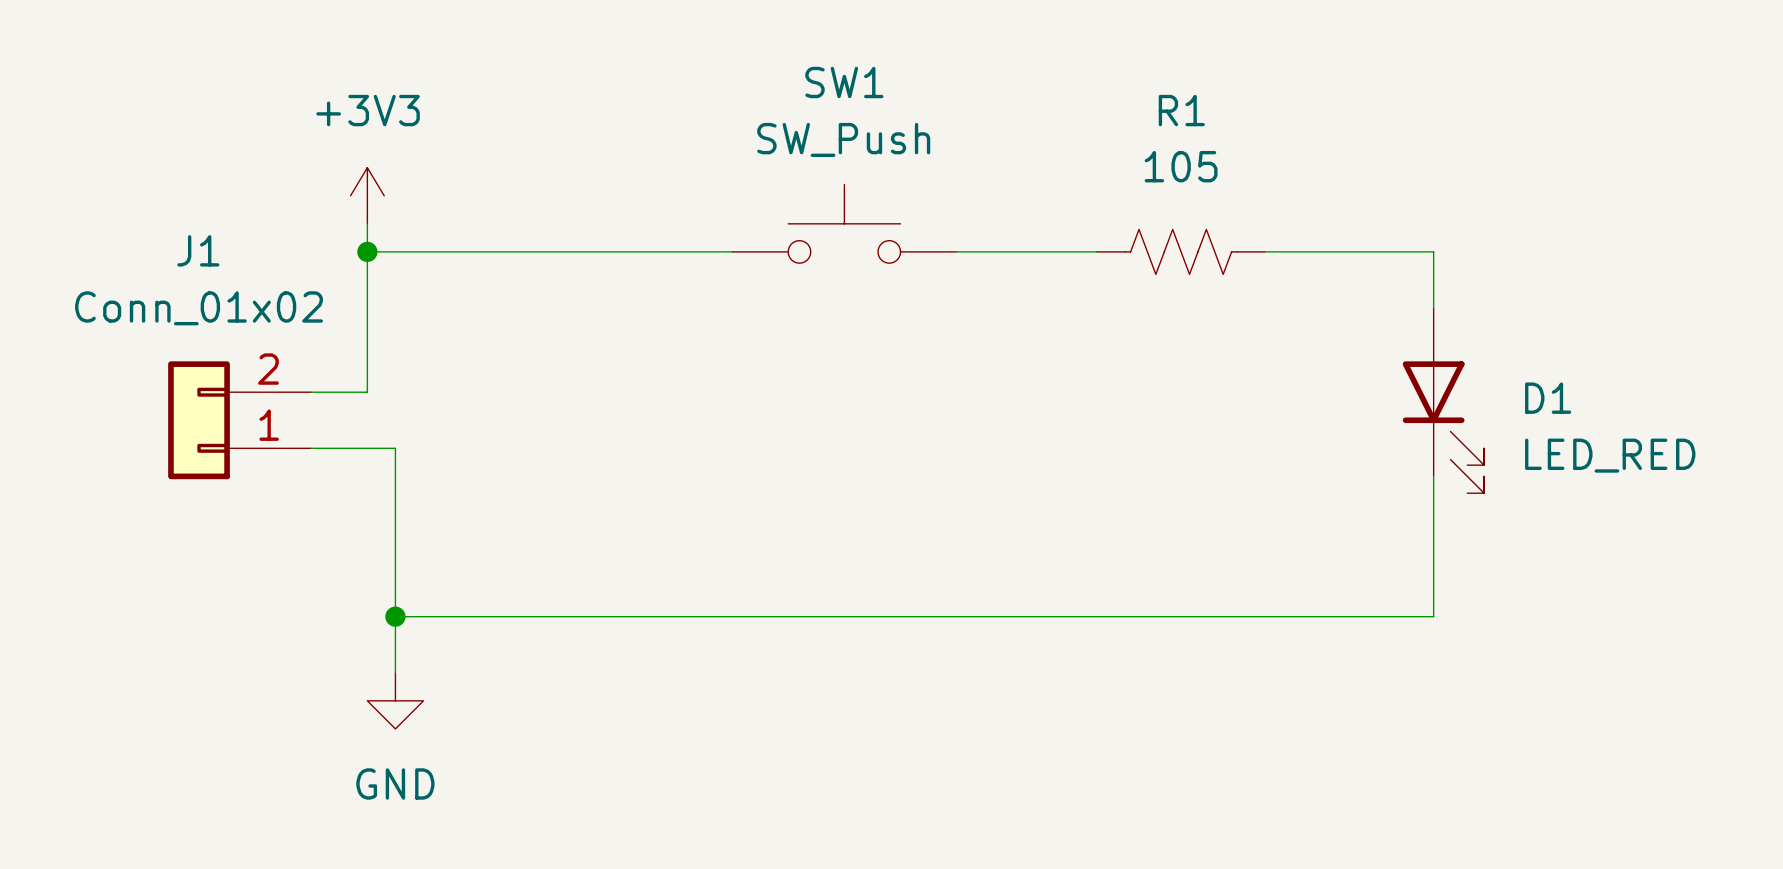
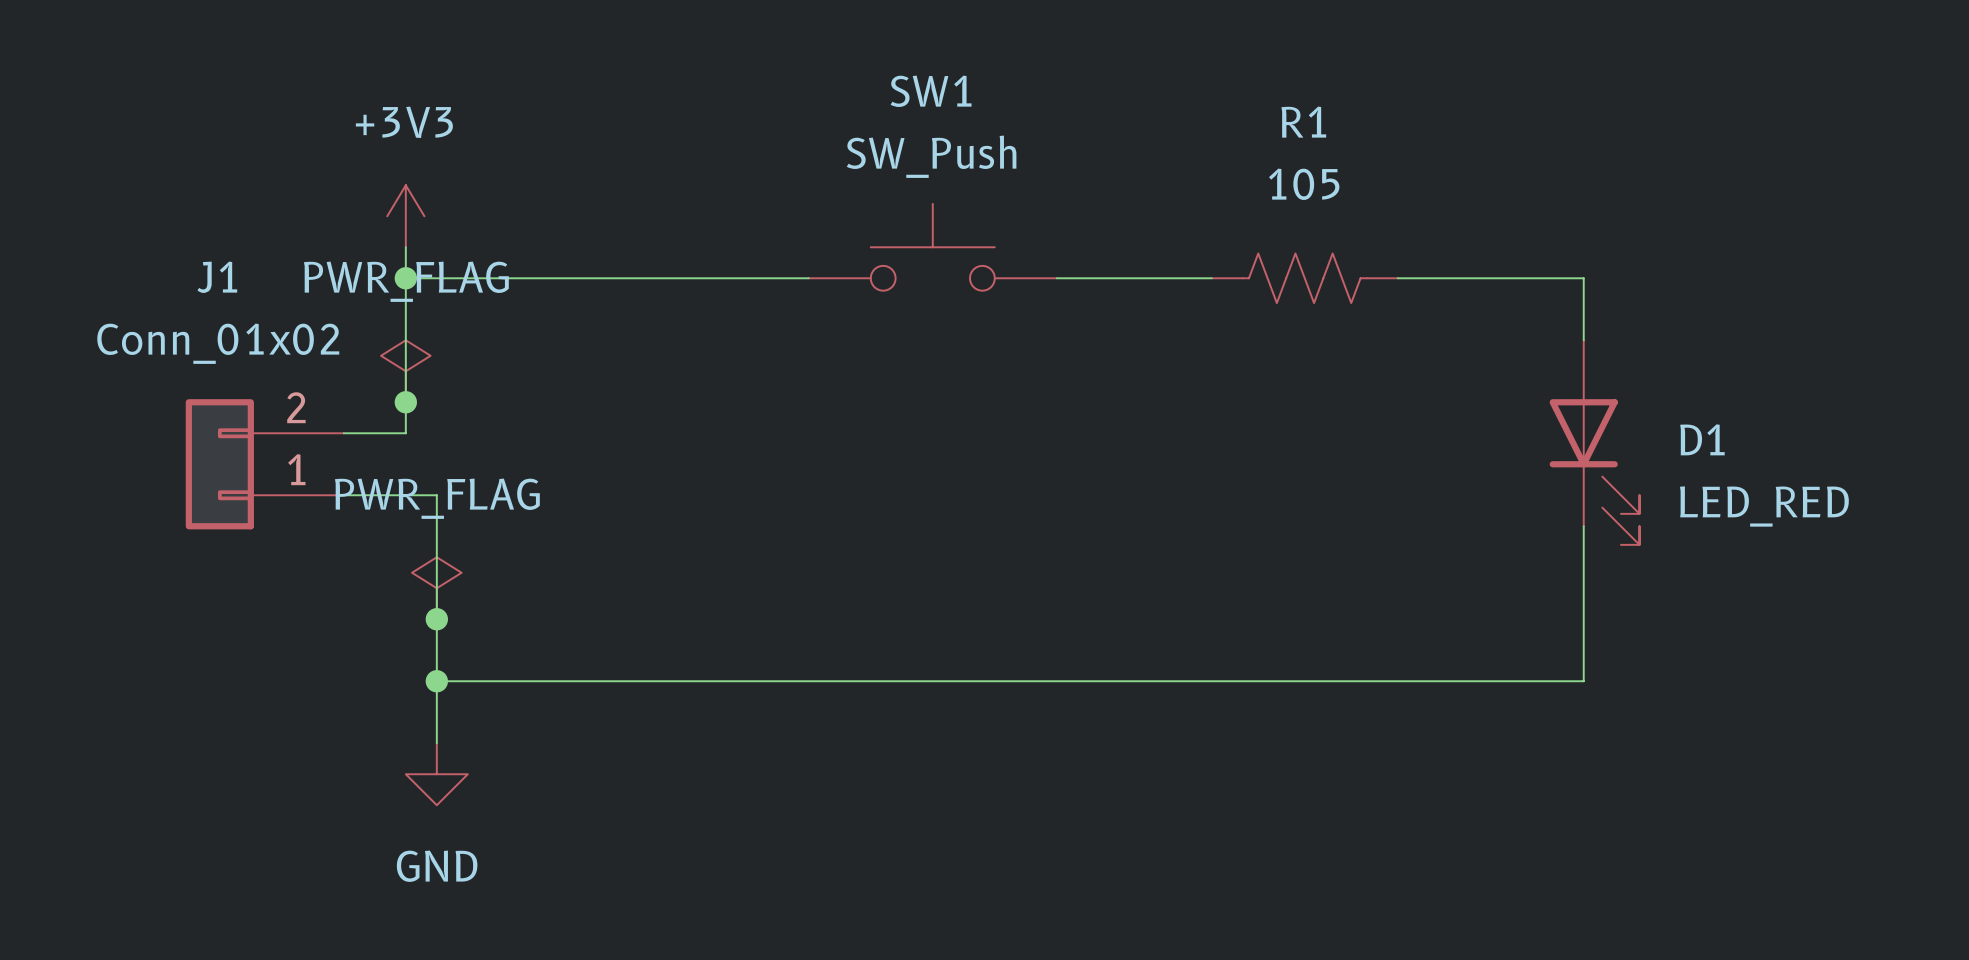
power symbol: none -> PWR_FLAG (405, 371)
junction: none -> (405, 402)
power symbol: none -> PWR_FLAG (436, 588)
junction: none -> (436, 619)

